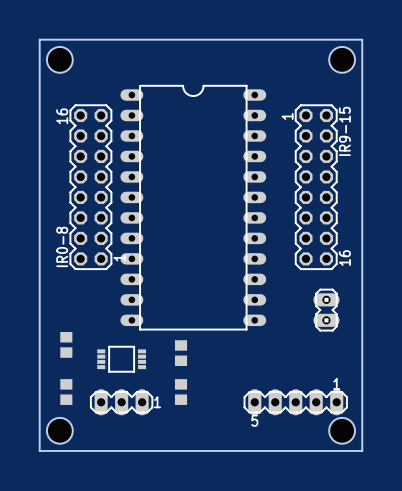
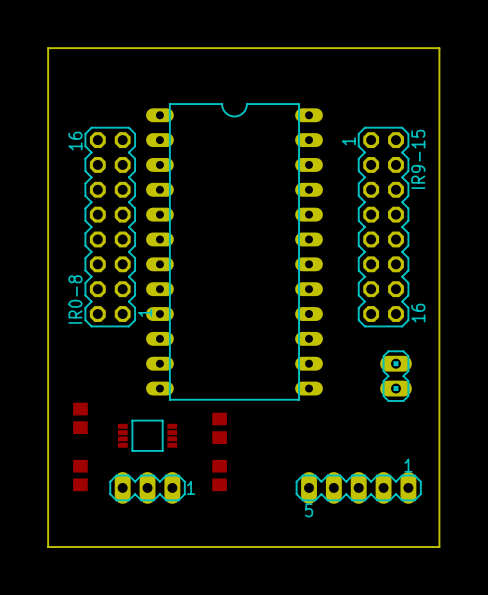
hole: (59, 59) -> none
hole: (342, 59) -> none
hole: (59, 430) -> none
hole: (342, 430) -> none

